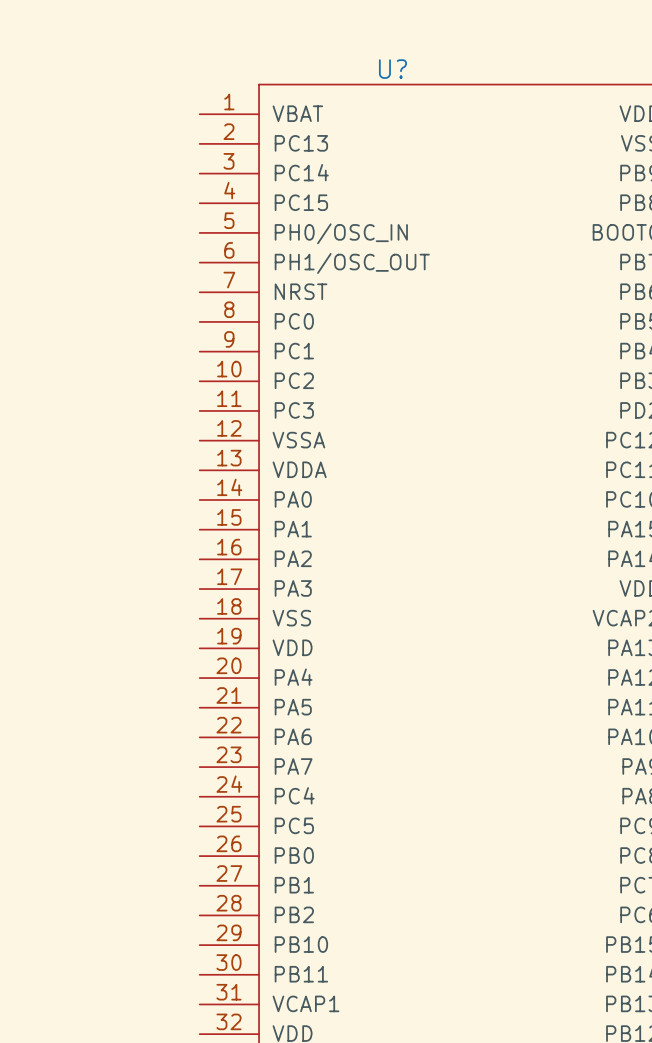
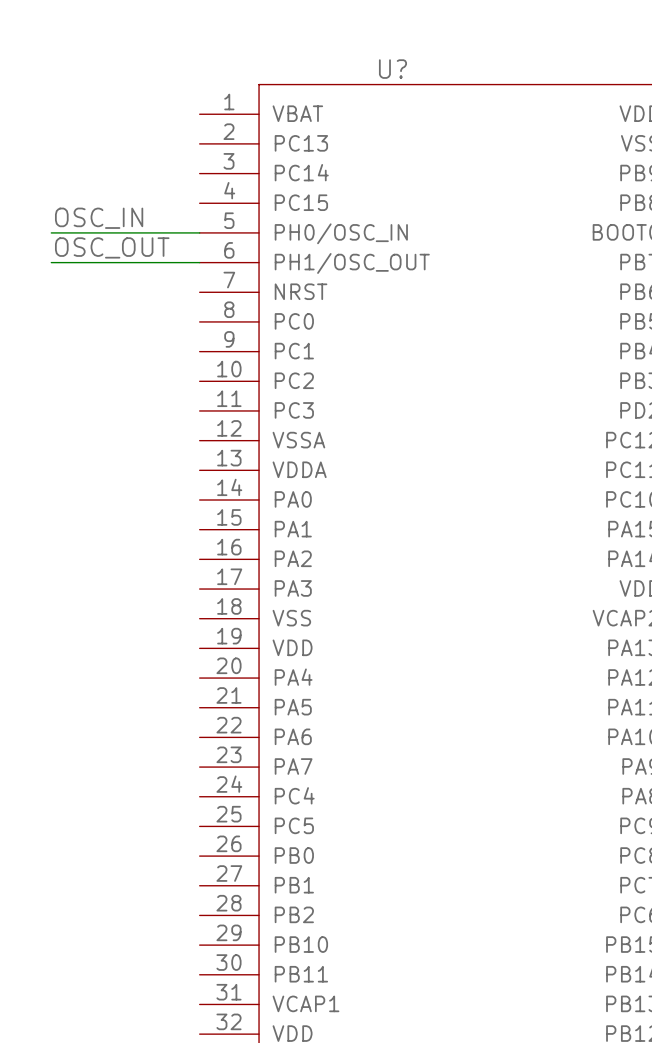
label: none -> OSC_IN (99, 218)
wire: none -> (51, 232) (199, 232)
label: none -> OSC_OUT (112, 247)
wire: none -> (51, 262) (199, 262)

